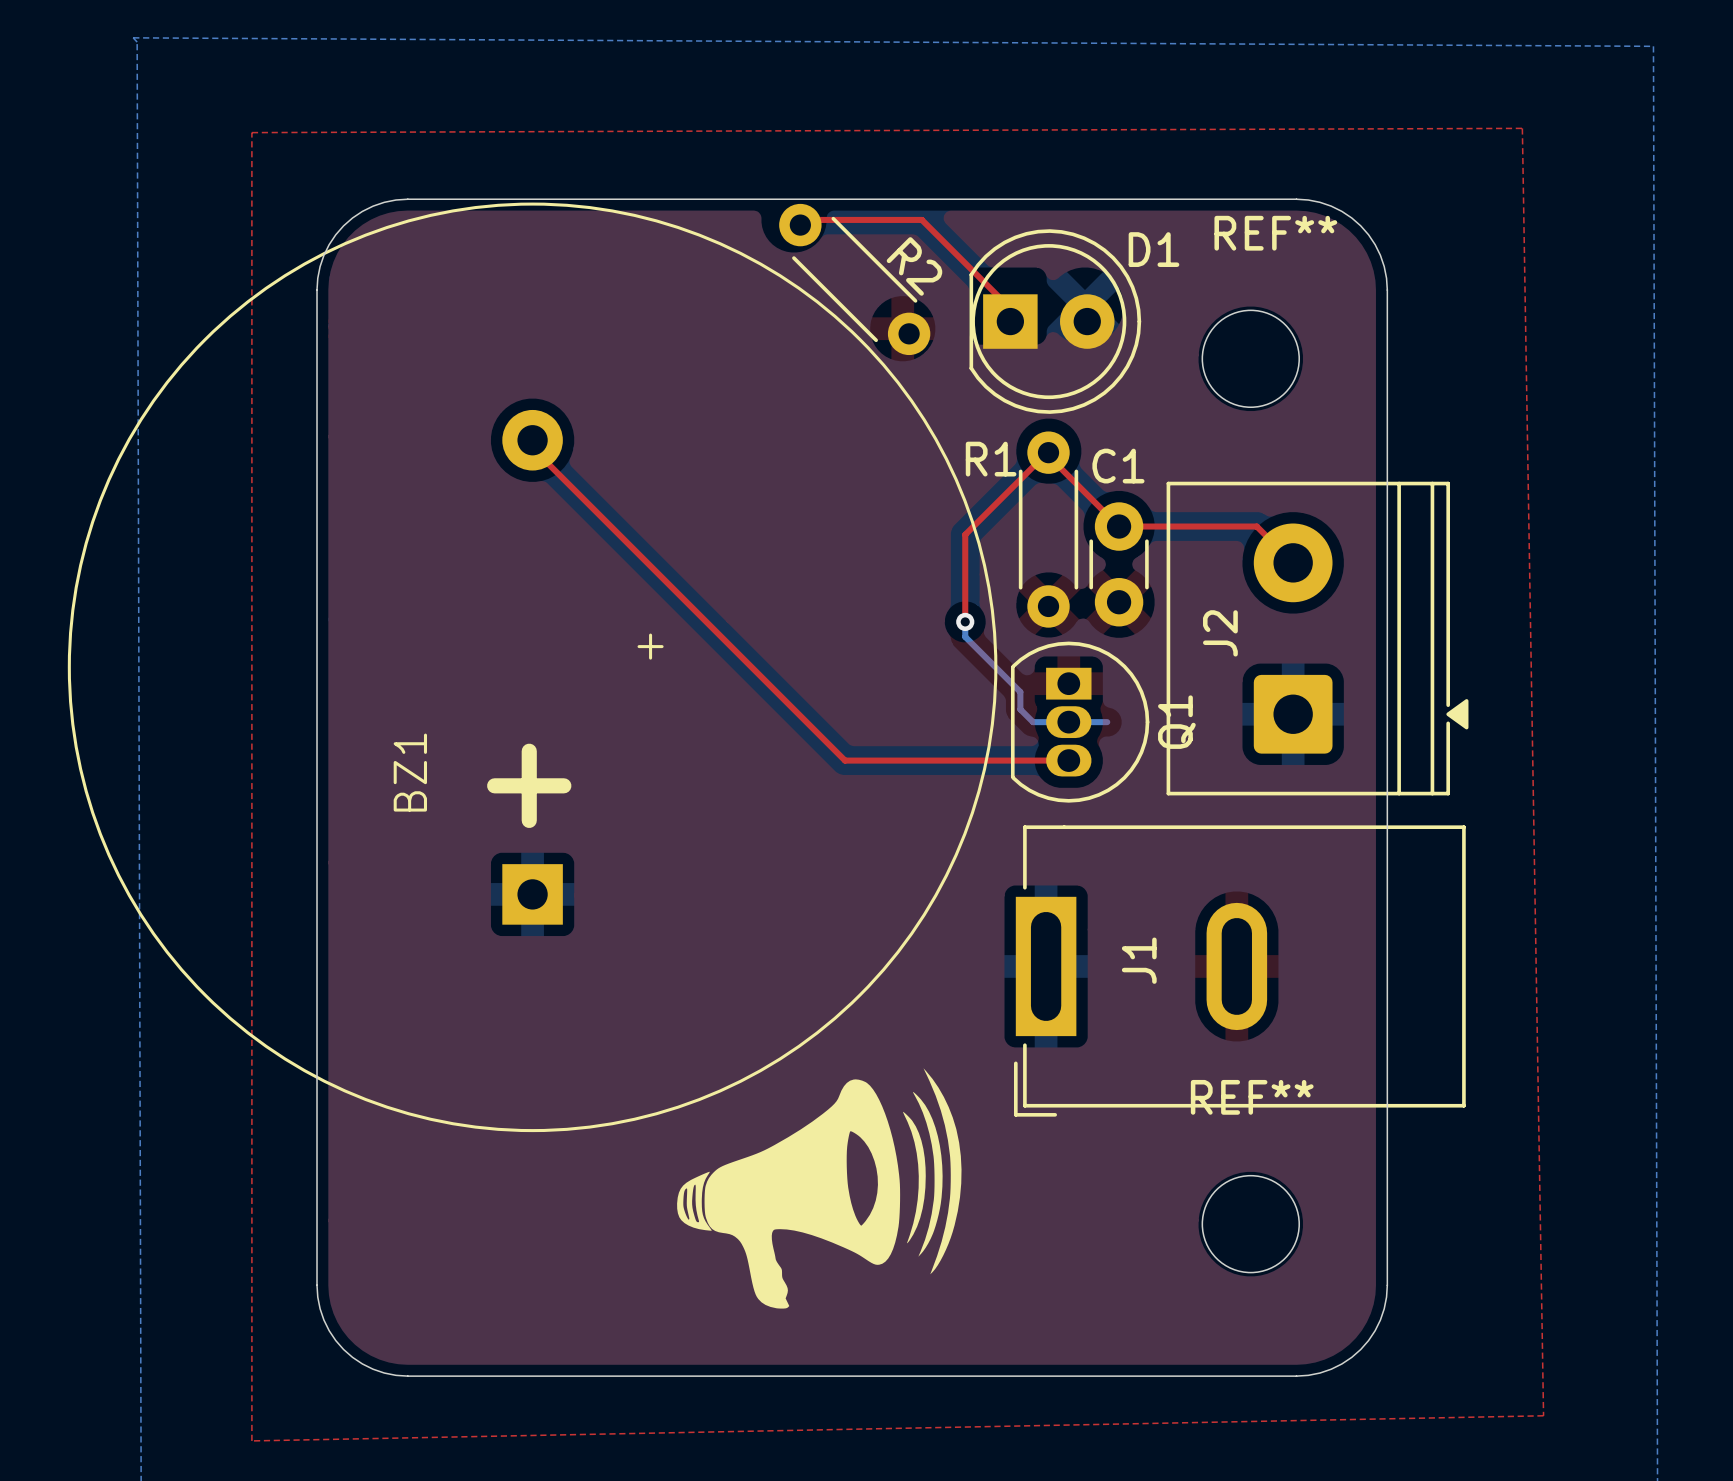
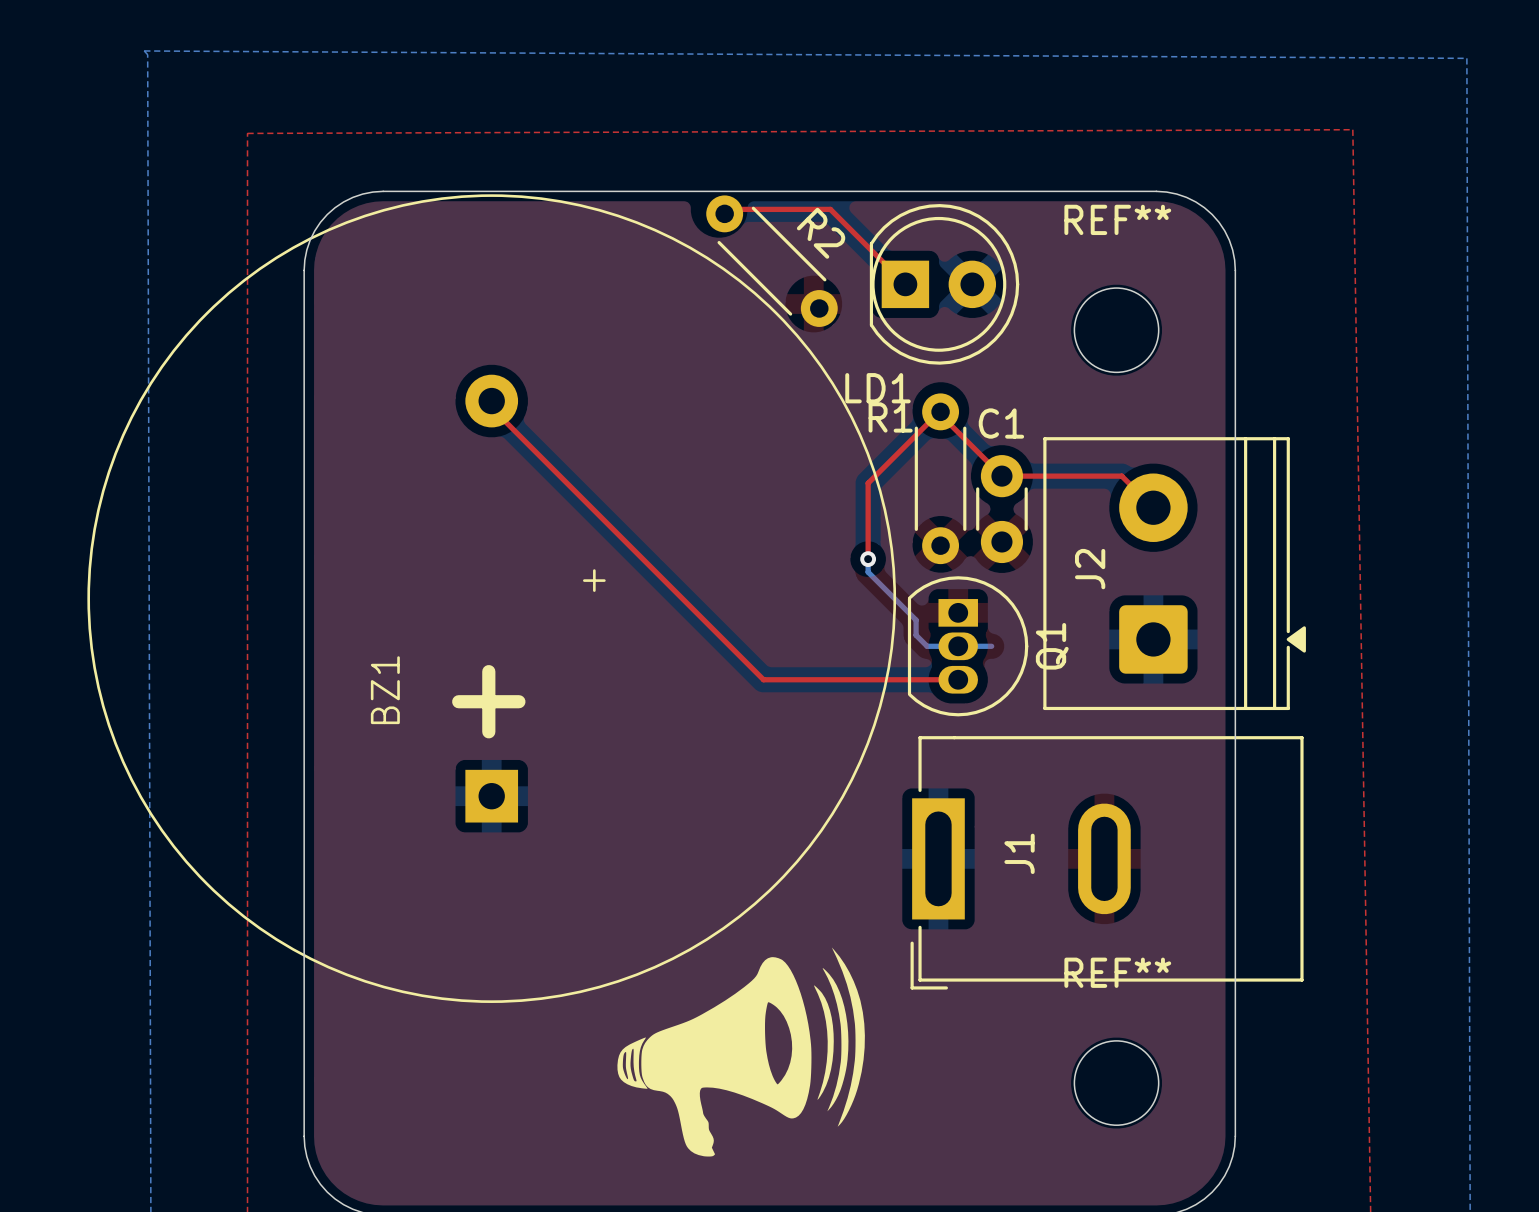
REF** name position: REF** (1275, 233) -> REF** (1117, 219)
D1 name: D1 (1153, 249) -> LD1 (877, 388)
R2 name position: R2 (914, 266) -> R2 (821, 233)
D1 position: (1055, 321) -> (944, 284)

